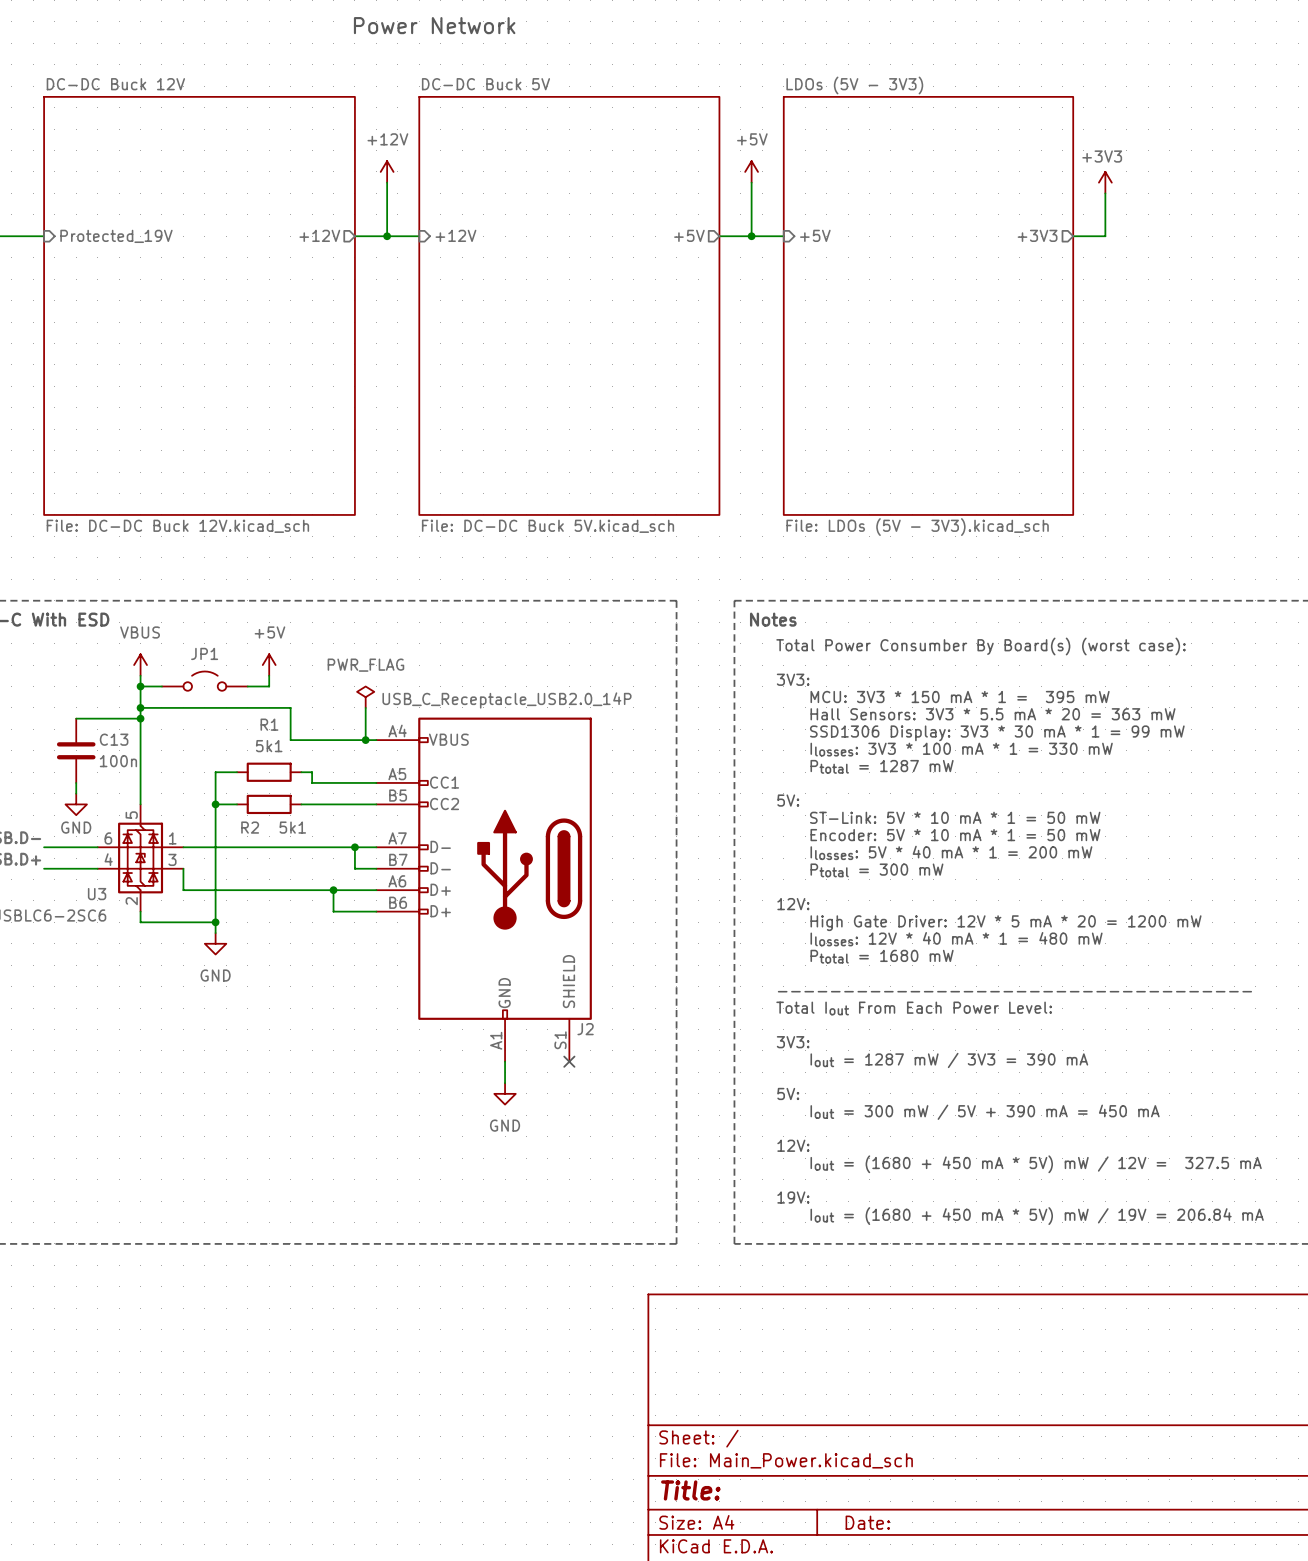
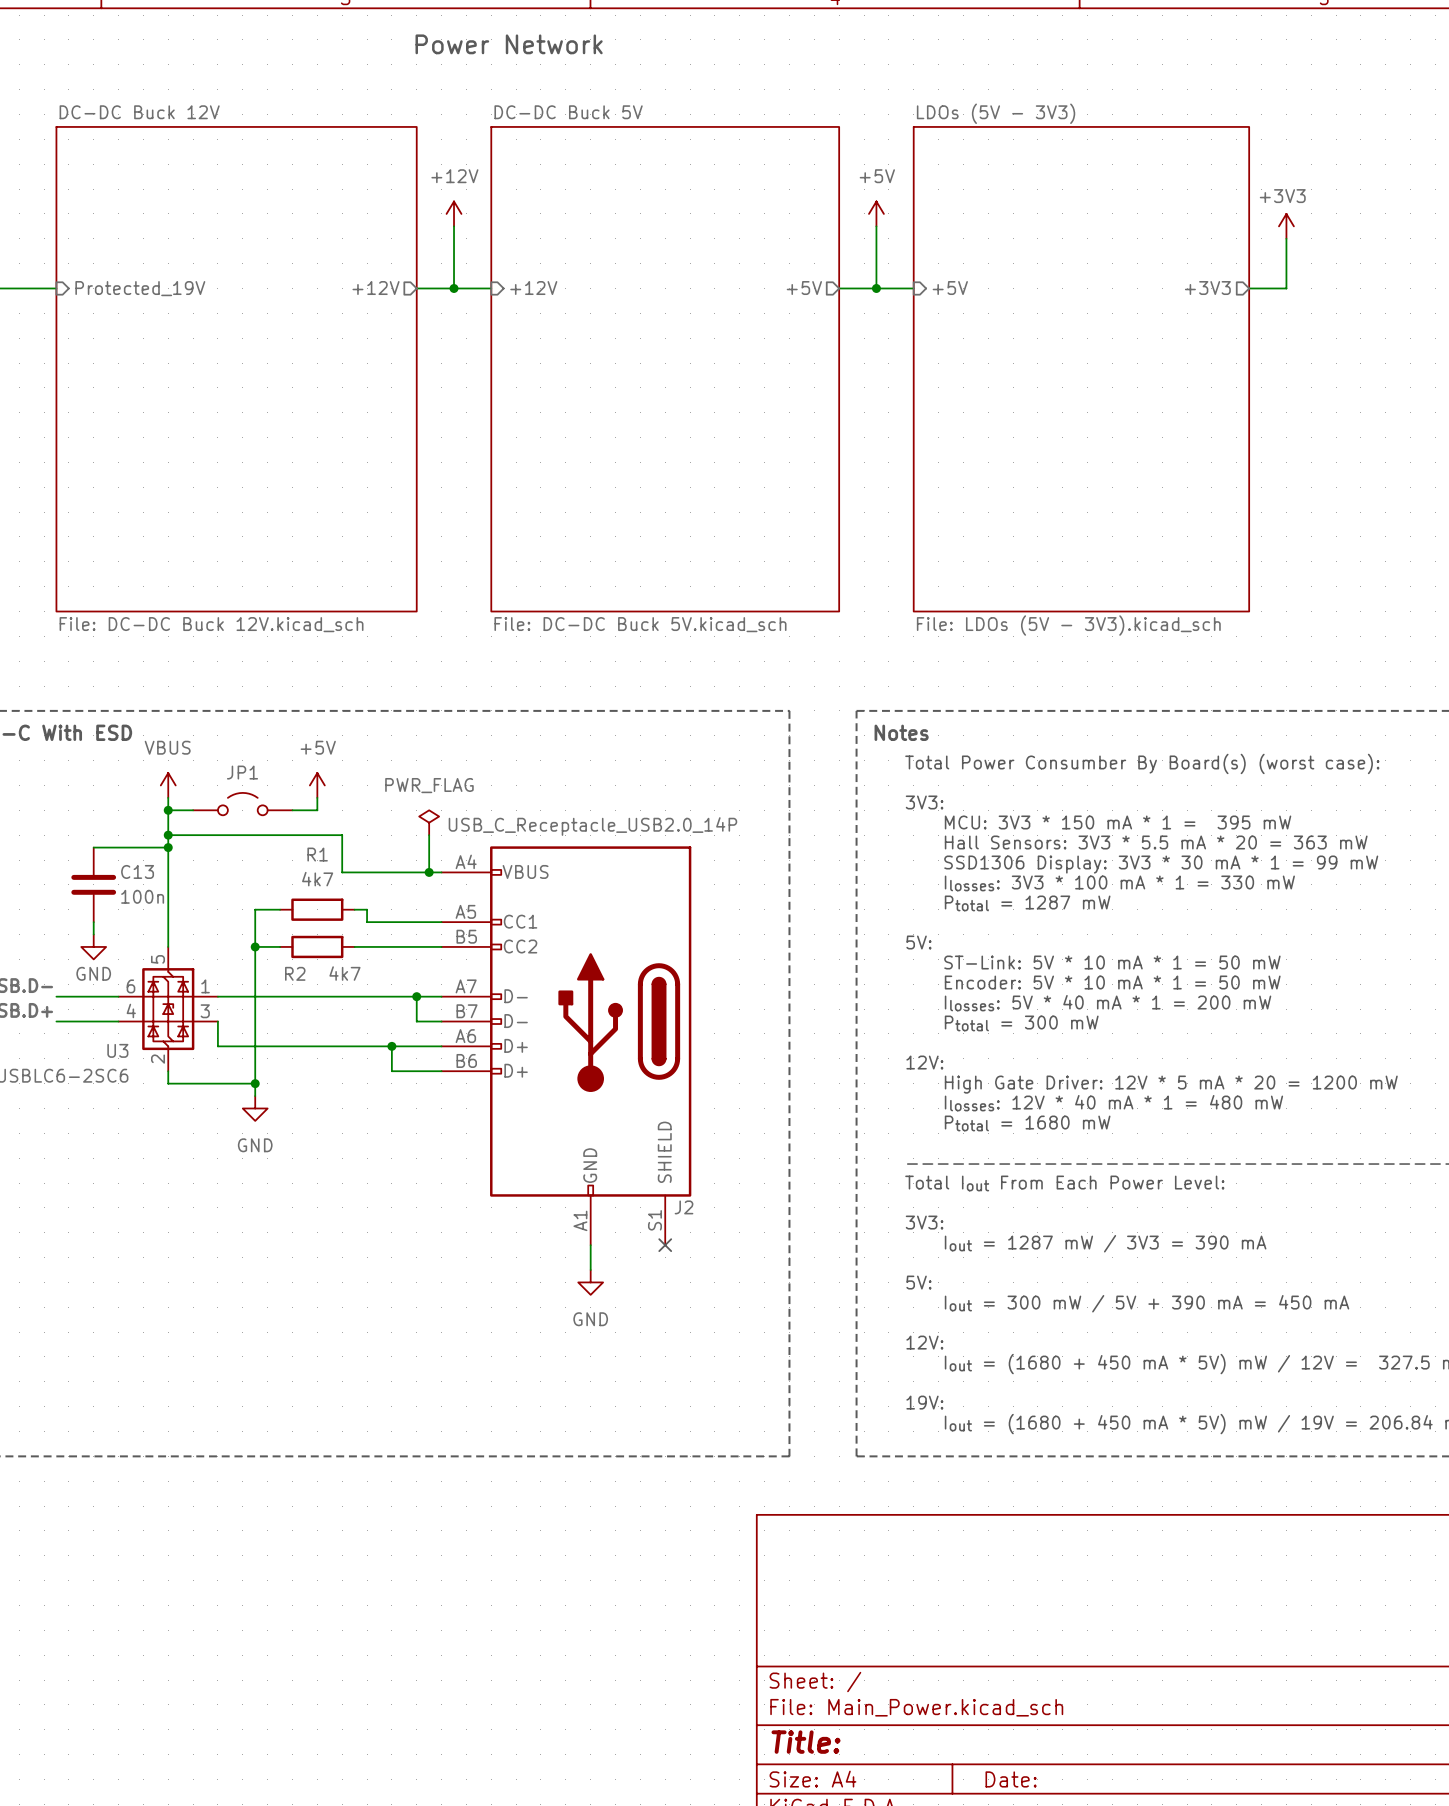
R1 value: 5k1 (269, 746) -> 4k7 (317, 879)
R2 value: 5k1 (292, 827) -> 4k7 (344, 973)

